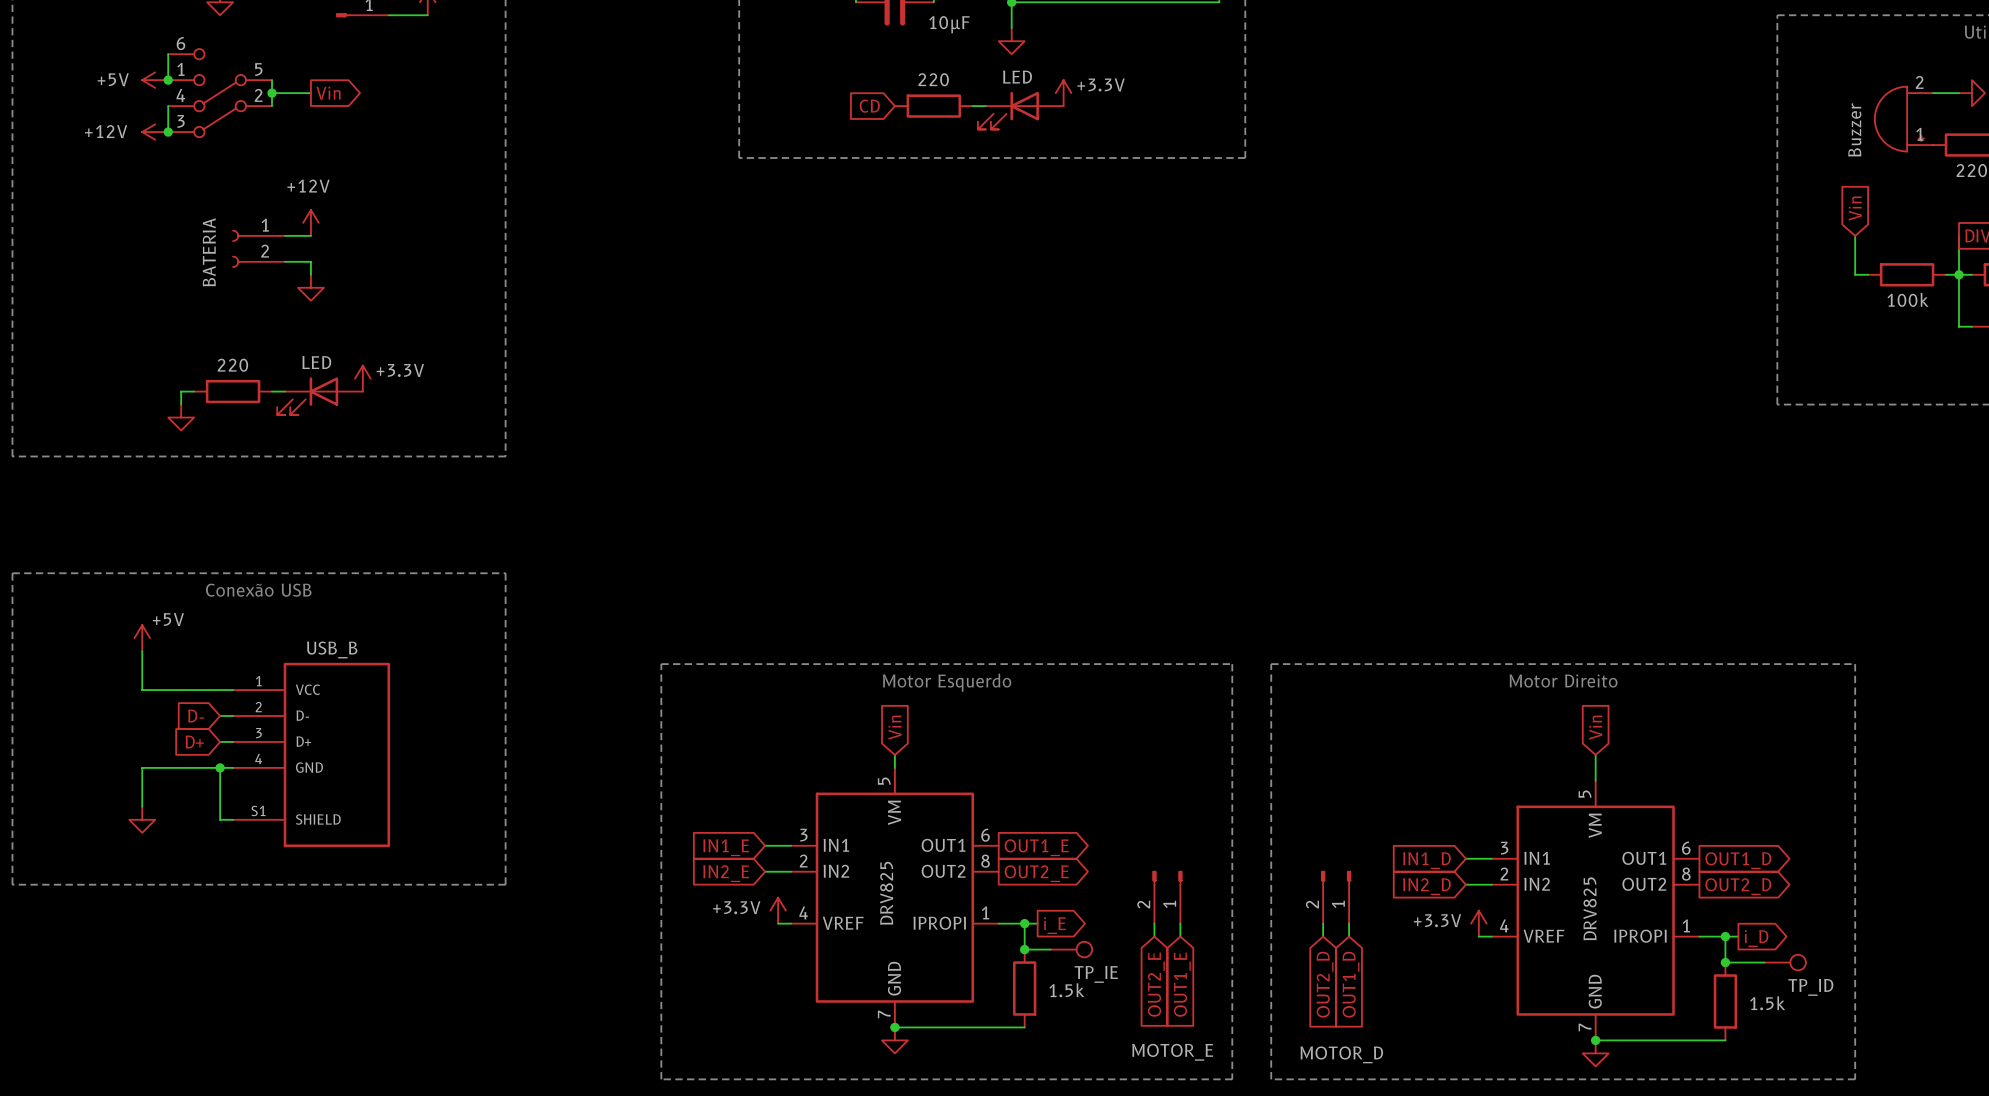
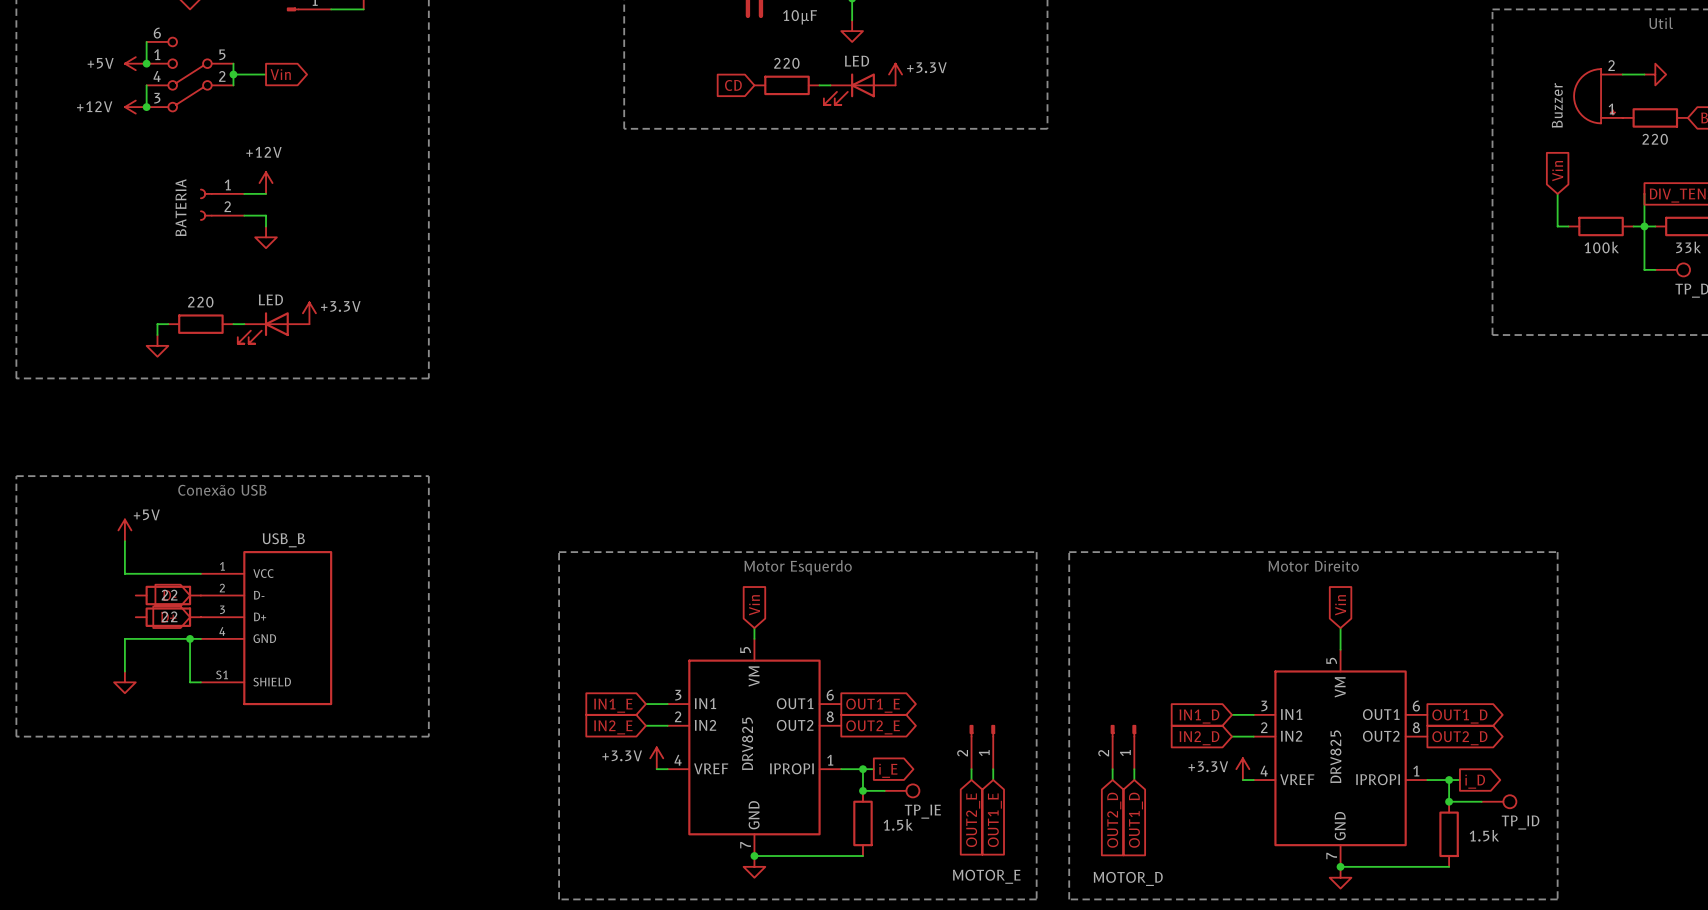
part: none -> 22 (168, 595)
part: none -> 22 (168, 617)

